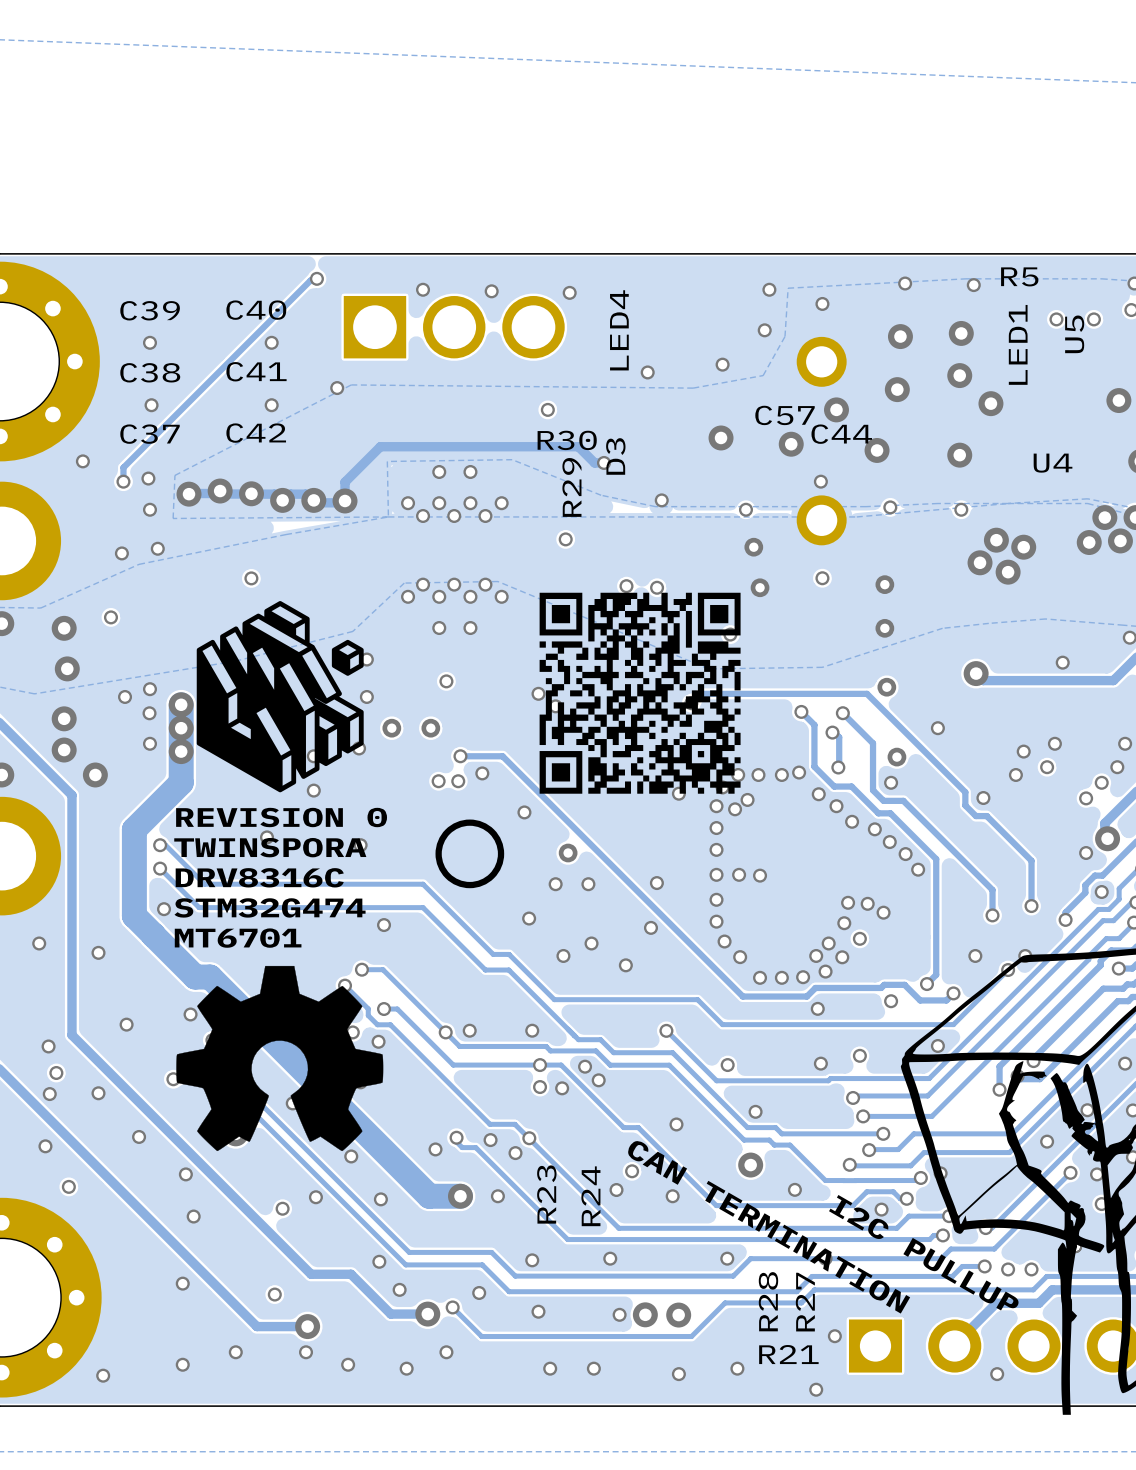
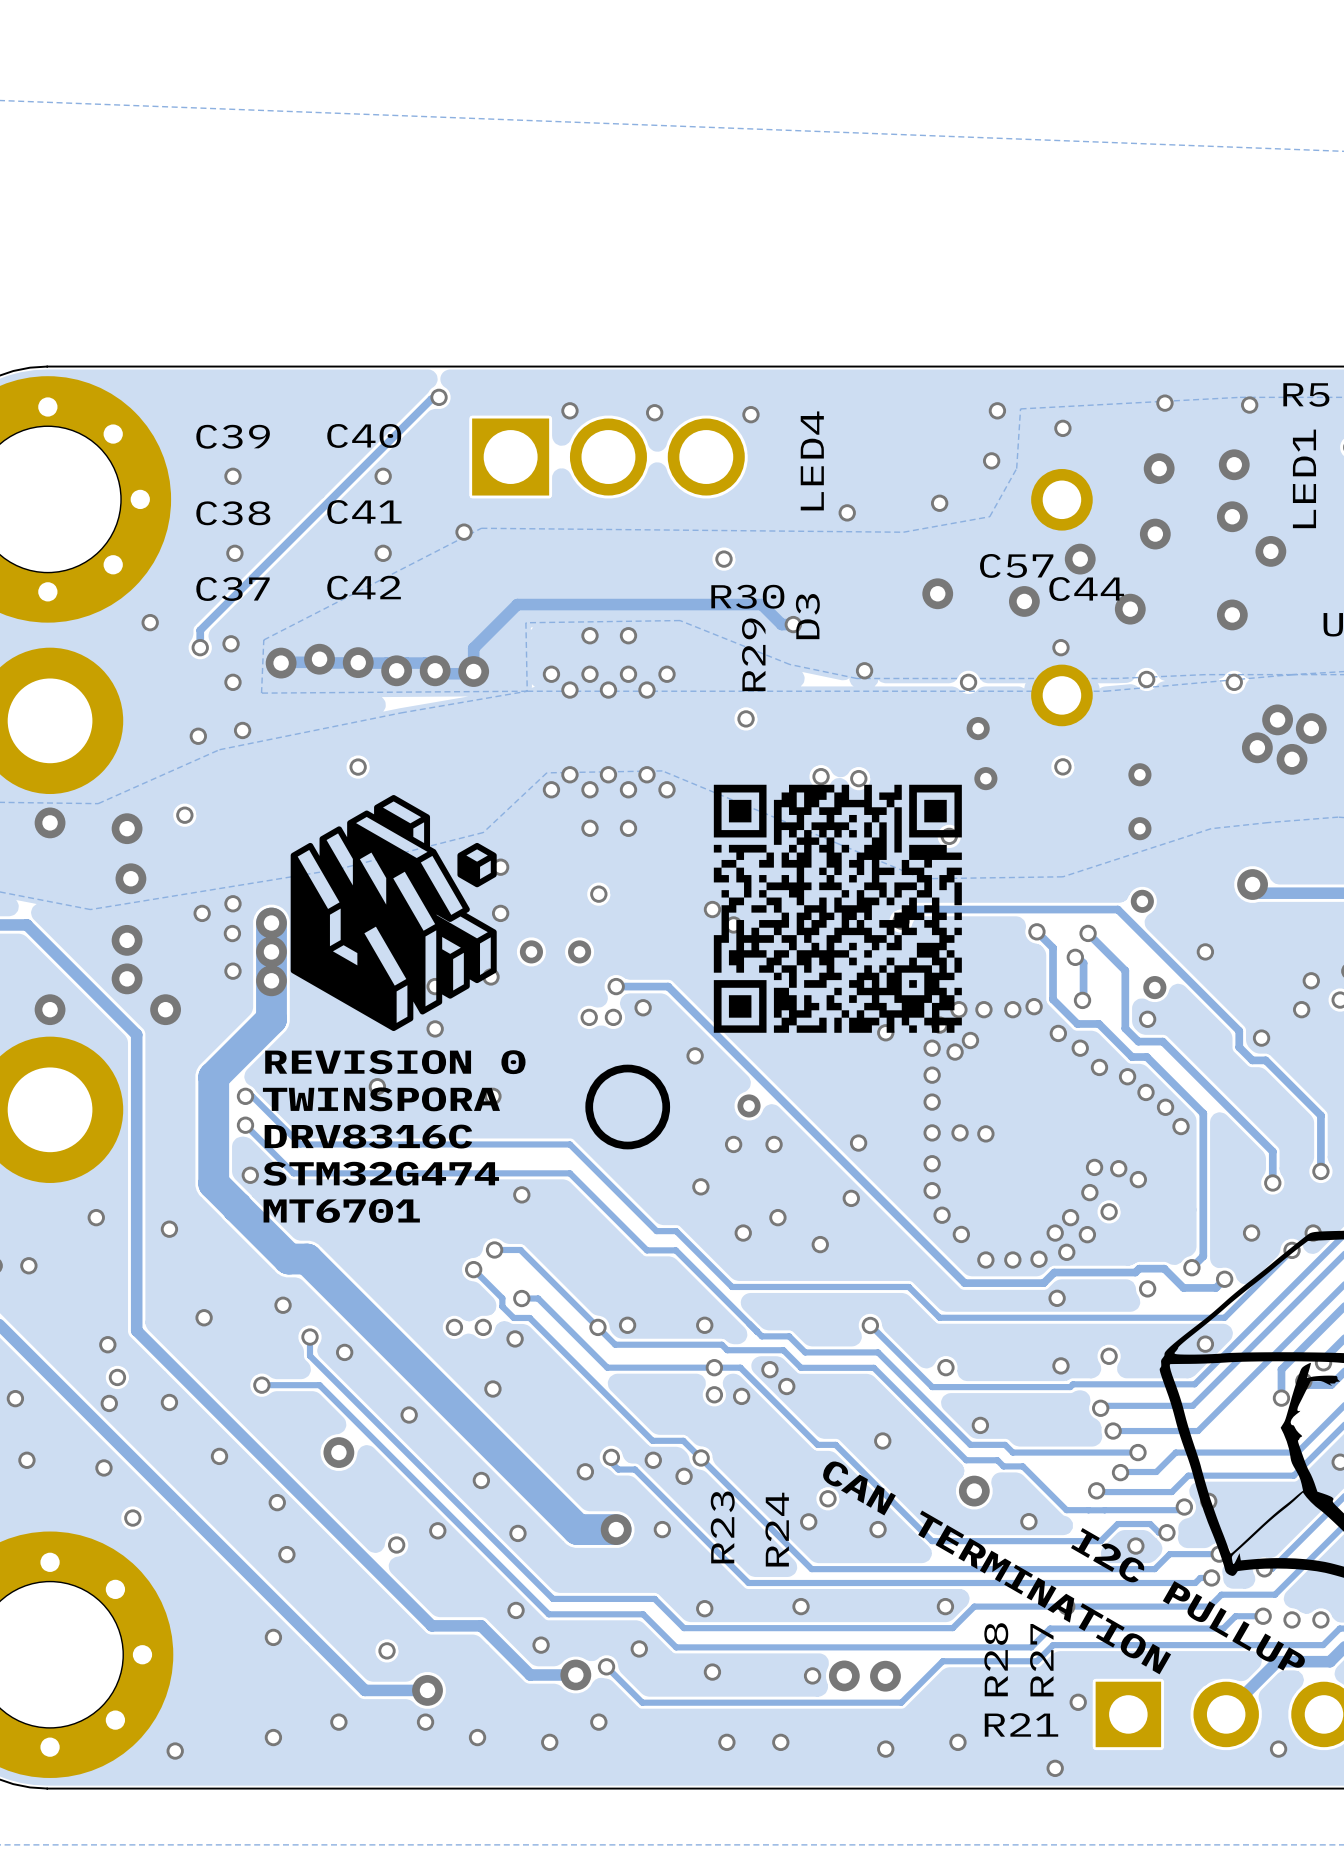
drawing: [176, 965, 384, 1152] -> none

